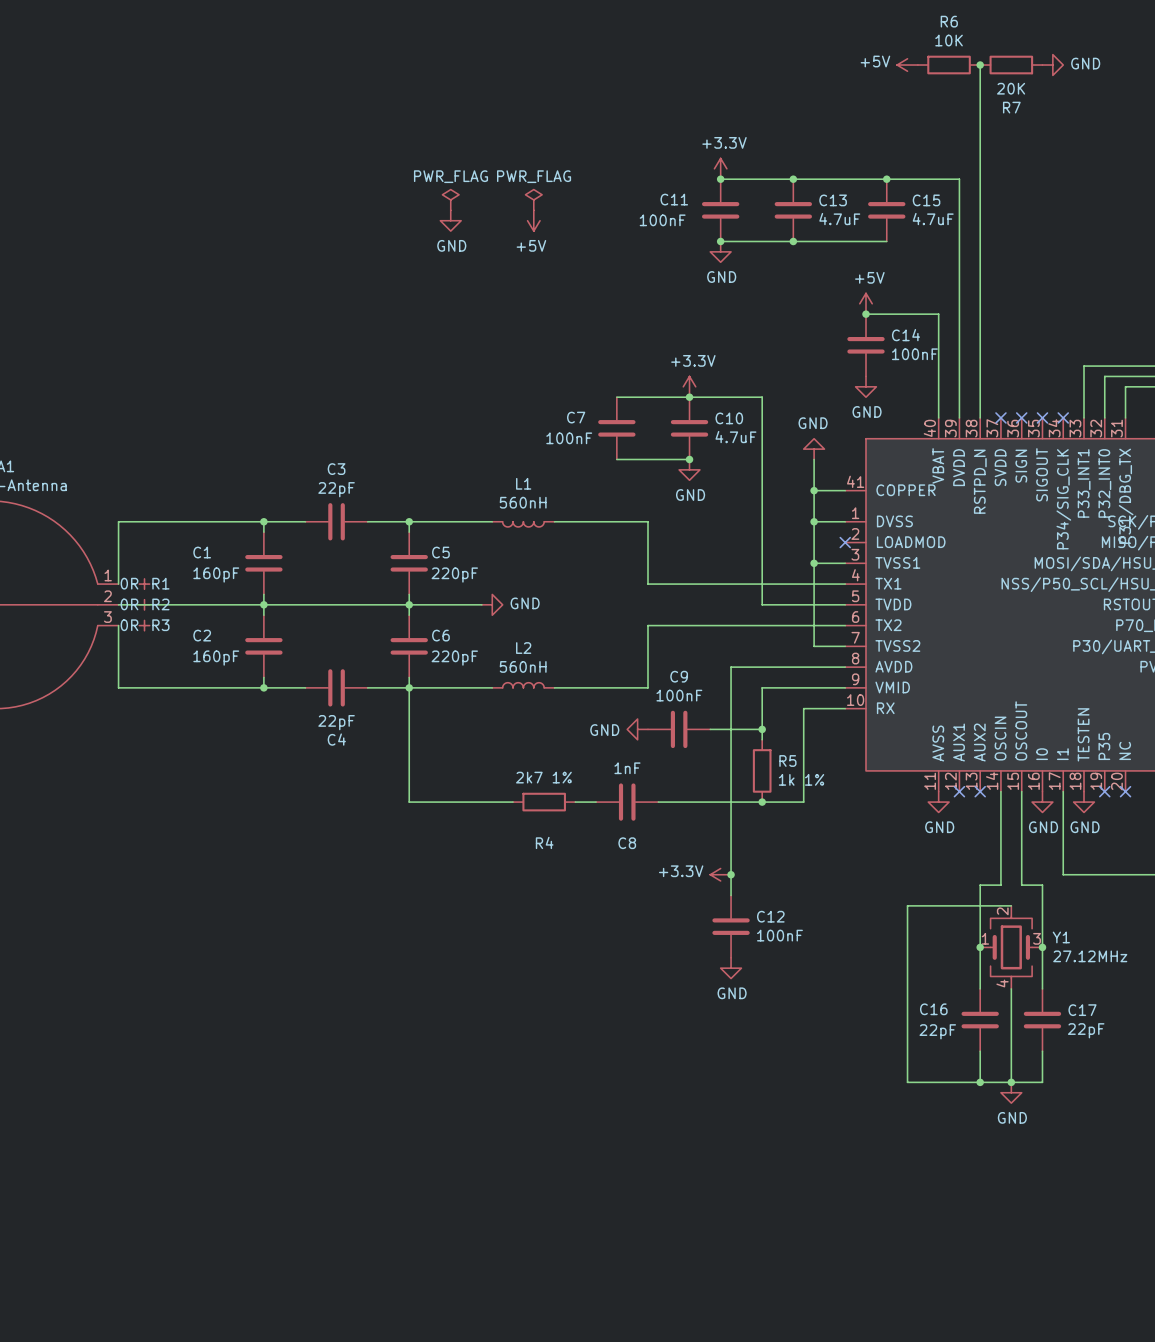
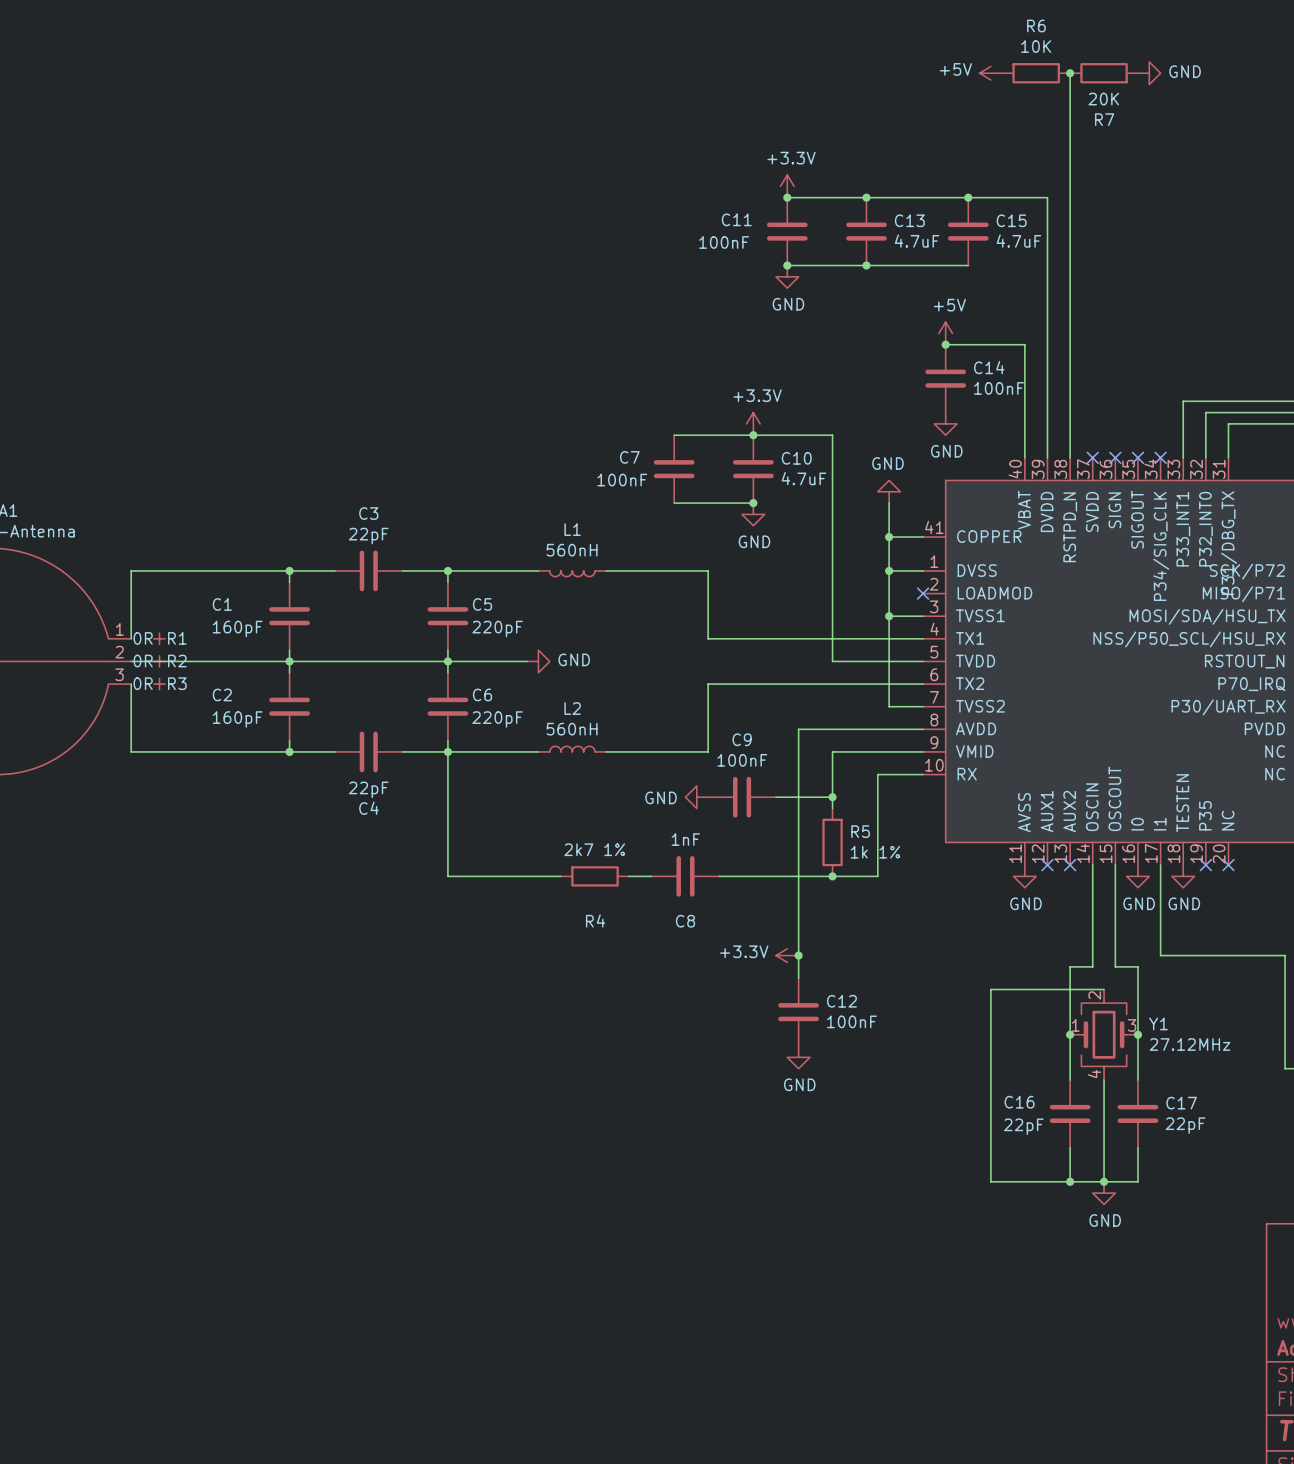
power symbol: PWR_FLAG (450, 199) -> none
power symbol: PWR_FLAG (533, 199) -> none
power symbol: GND (450, 220) -> none
power symbol: +5V (533, 220) -> none

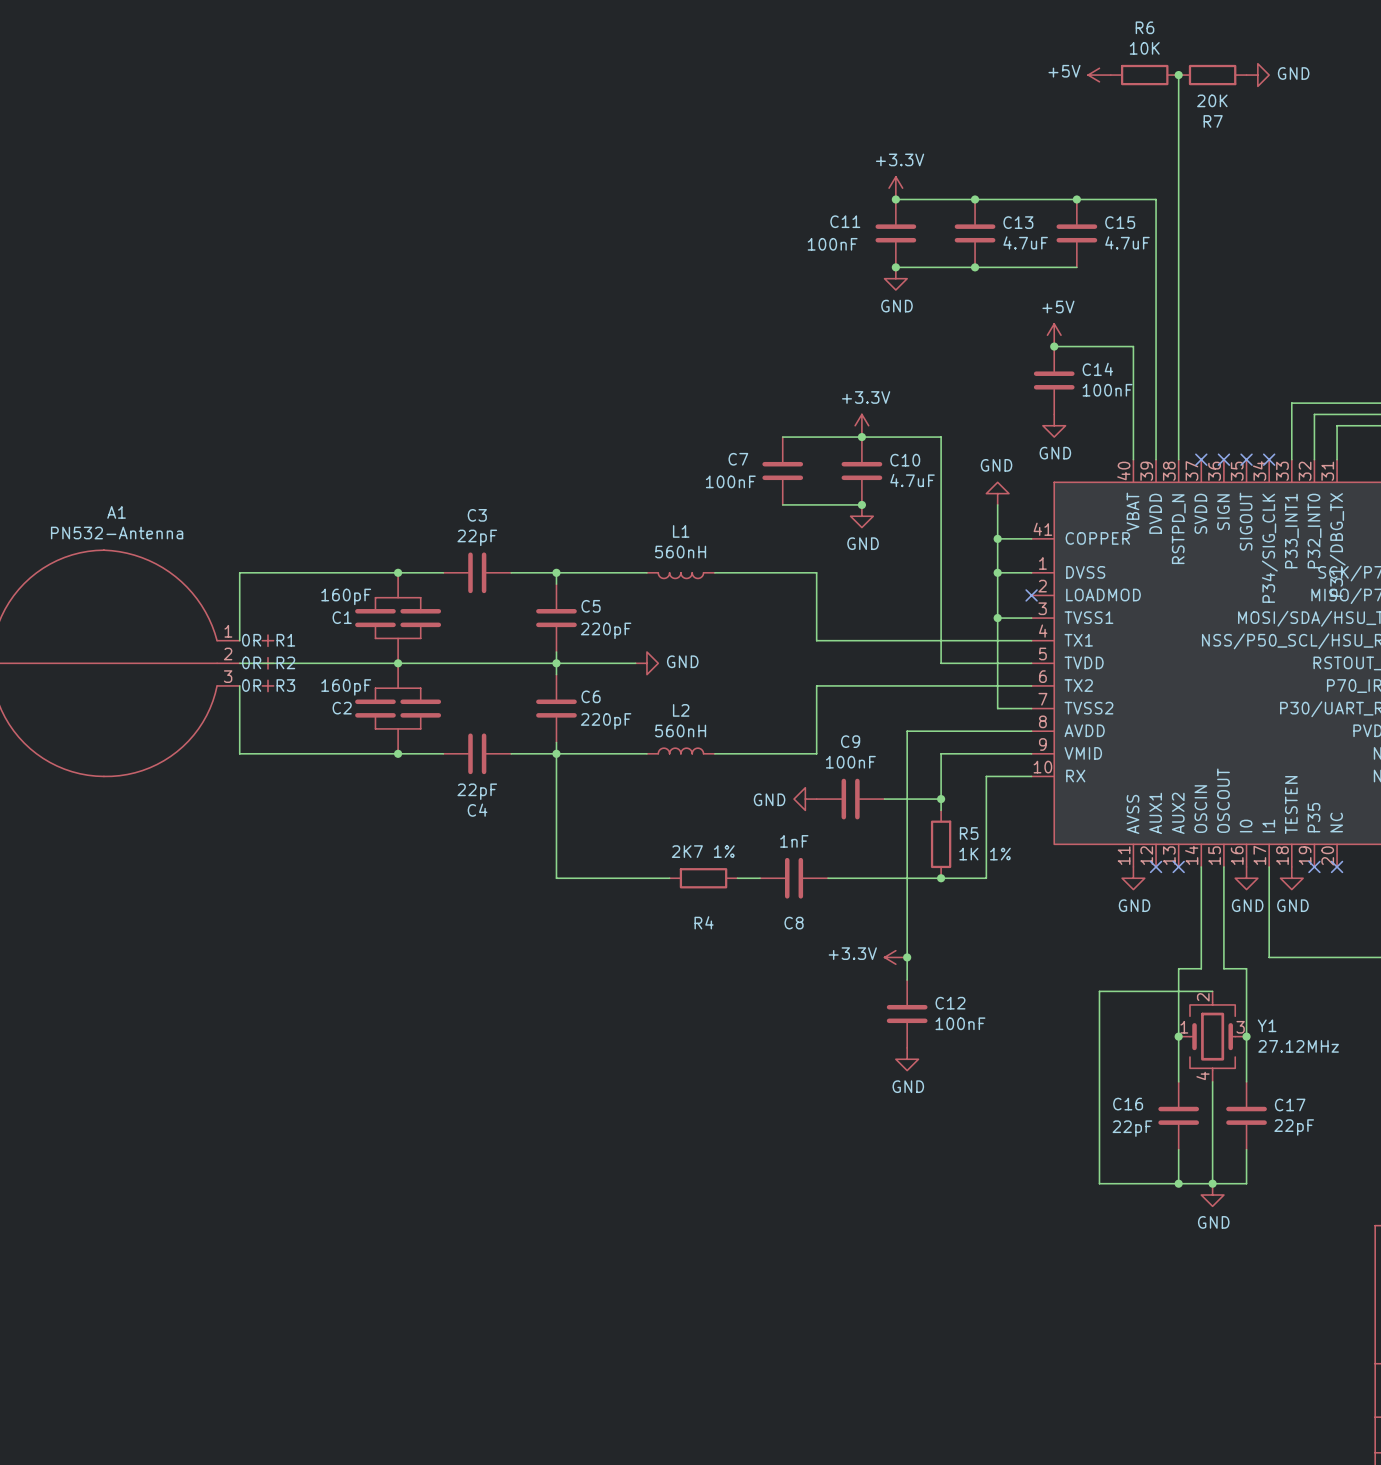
C1 symbol: [269, 582, 310, 651] -> [355, 572, 442, 664]
C1 value position: 160pF (237, 628) -> 160pF (346, 596)
C2 symbol: [269, 672, 310, 741] -> [355, 663, 442, 754]
C2 value position: 160pF (237, 719) -> 160pF (346, 687)
R4 value: 2k7 1% (594, 849) -> 2K7 1% (703, 851)
R5 value: 1k 1% (875, 852) -> 1K 1% (985, 854)

